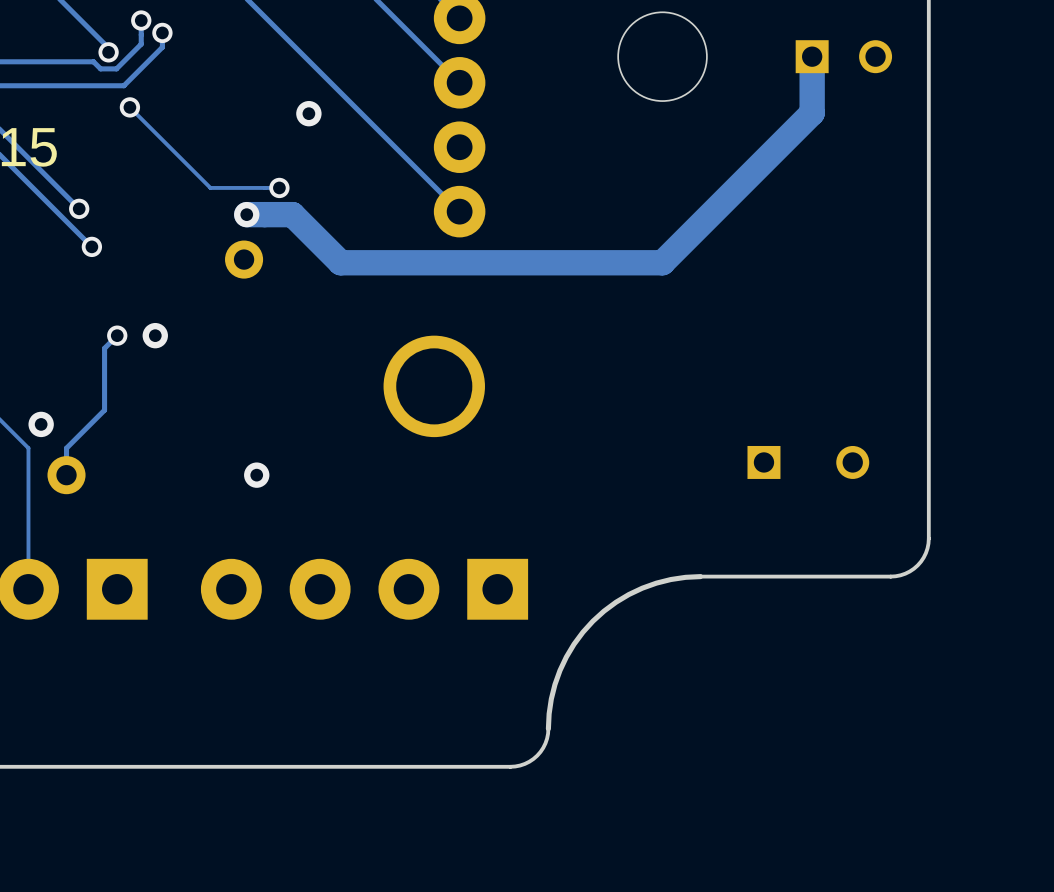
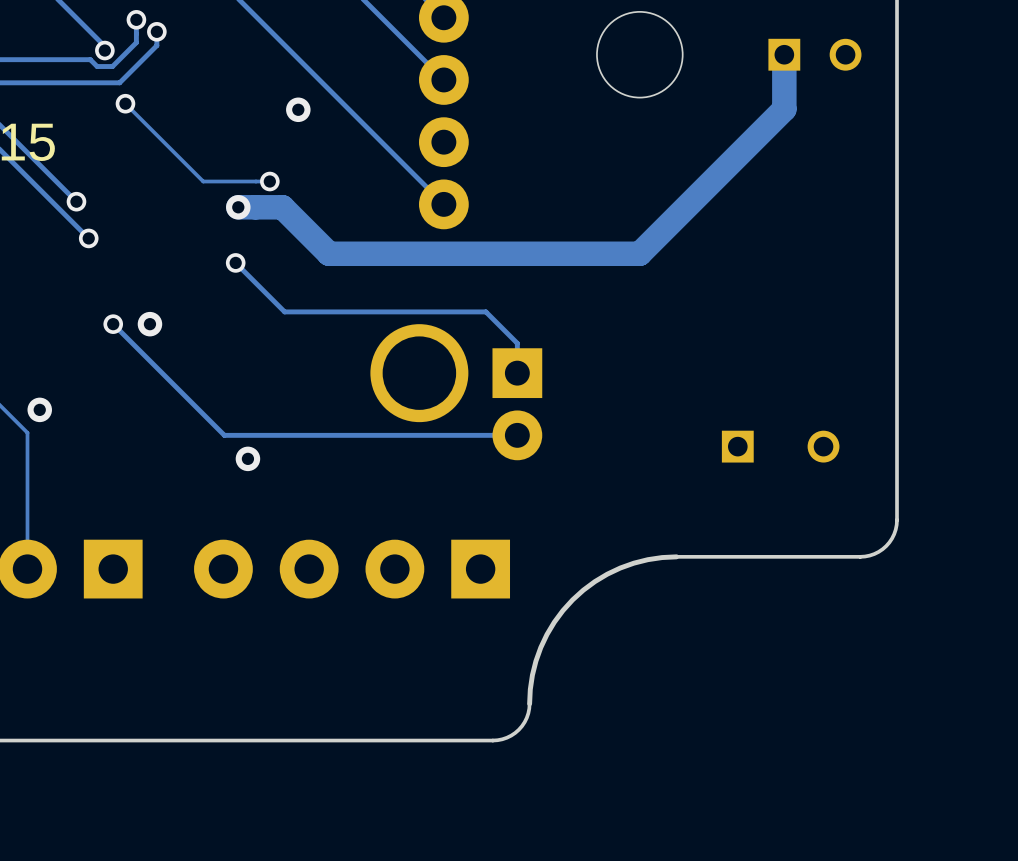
part: (244, 259) -> none
track: none -> (235, 262) (284, 311) (485, 311) (517, 343) (517, 373)
via: none -> (235, 262)
track: (117, 335) (104, 348) (104, 410) (66, 448) (66, 475) -> (113, 324) (224, 435) (517, 435)
part: none -> (517, 404)
part: (66, 475) -> none

